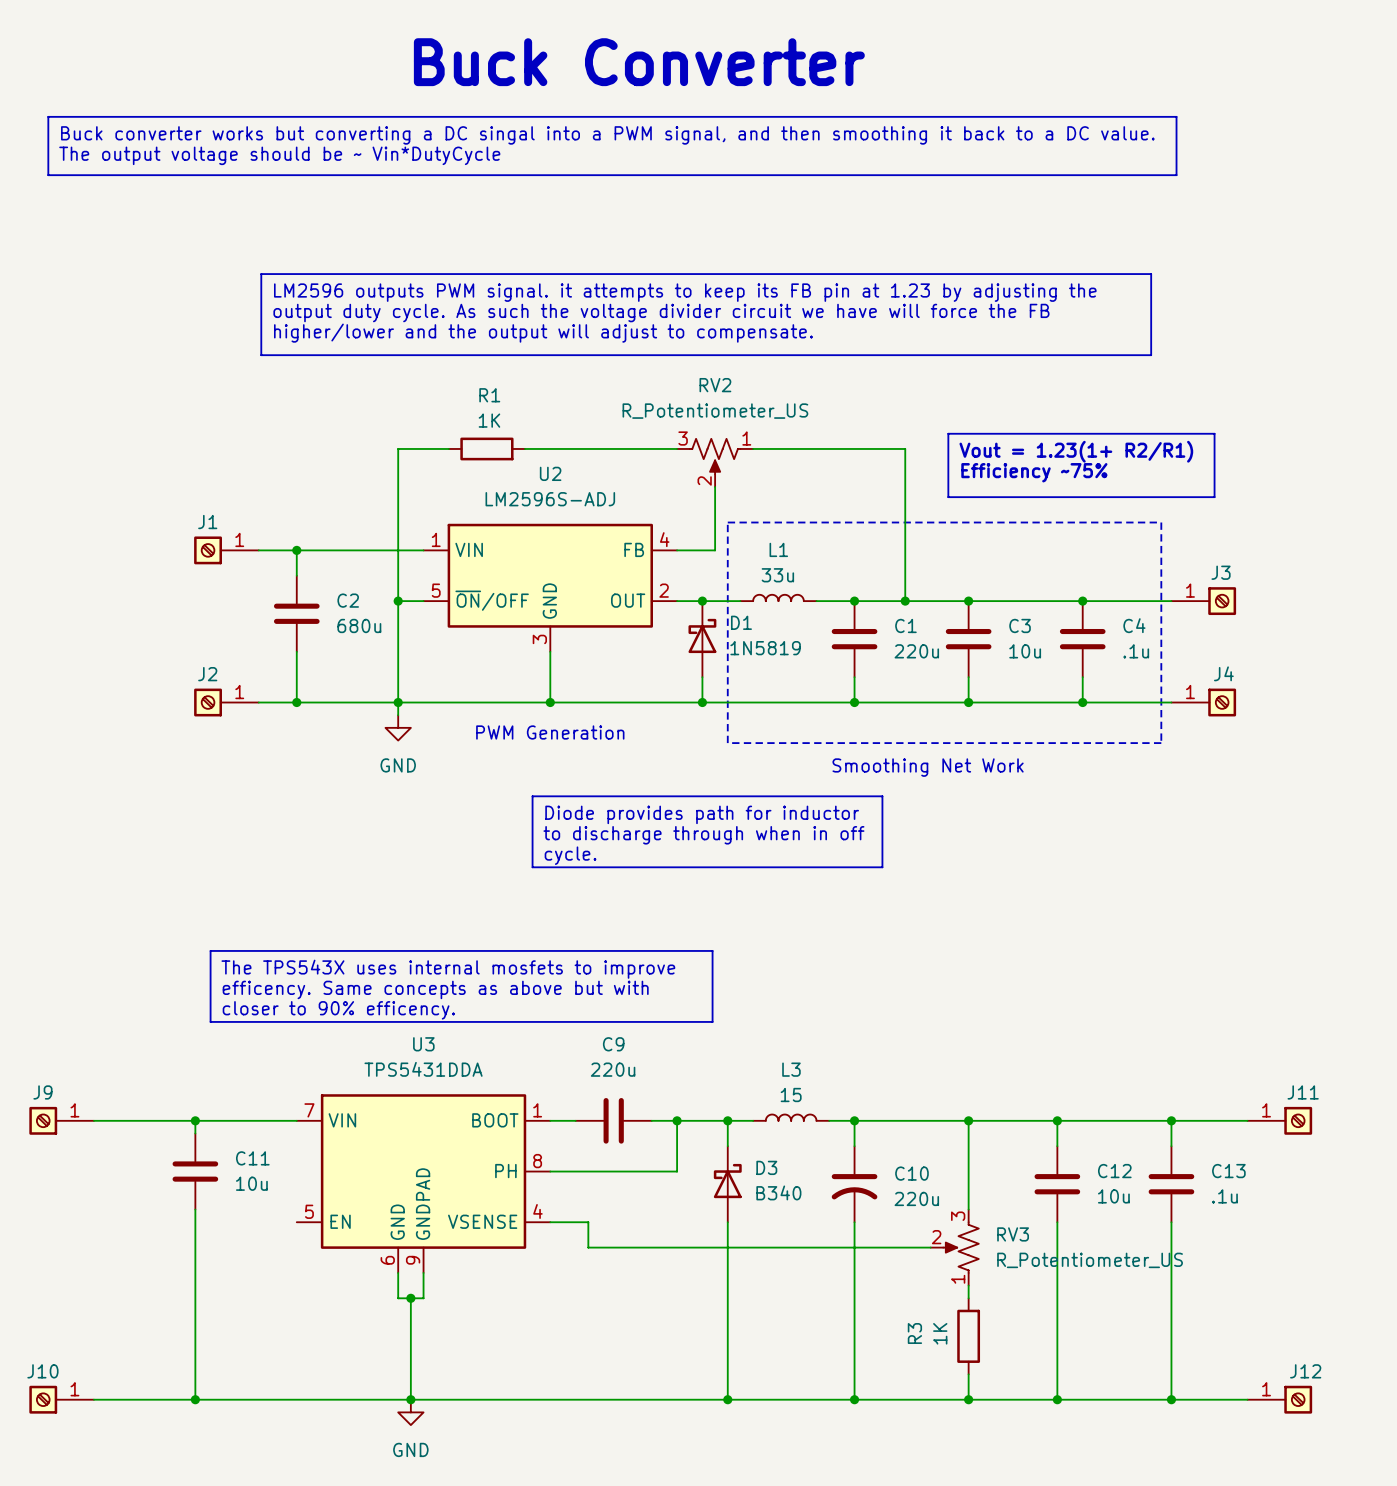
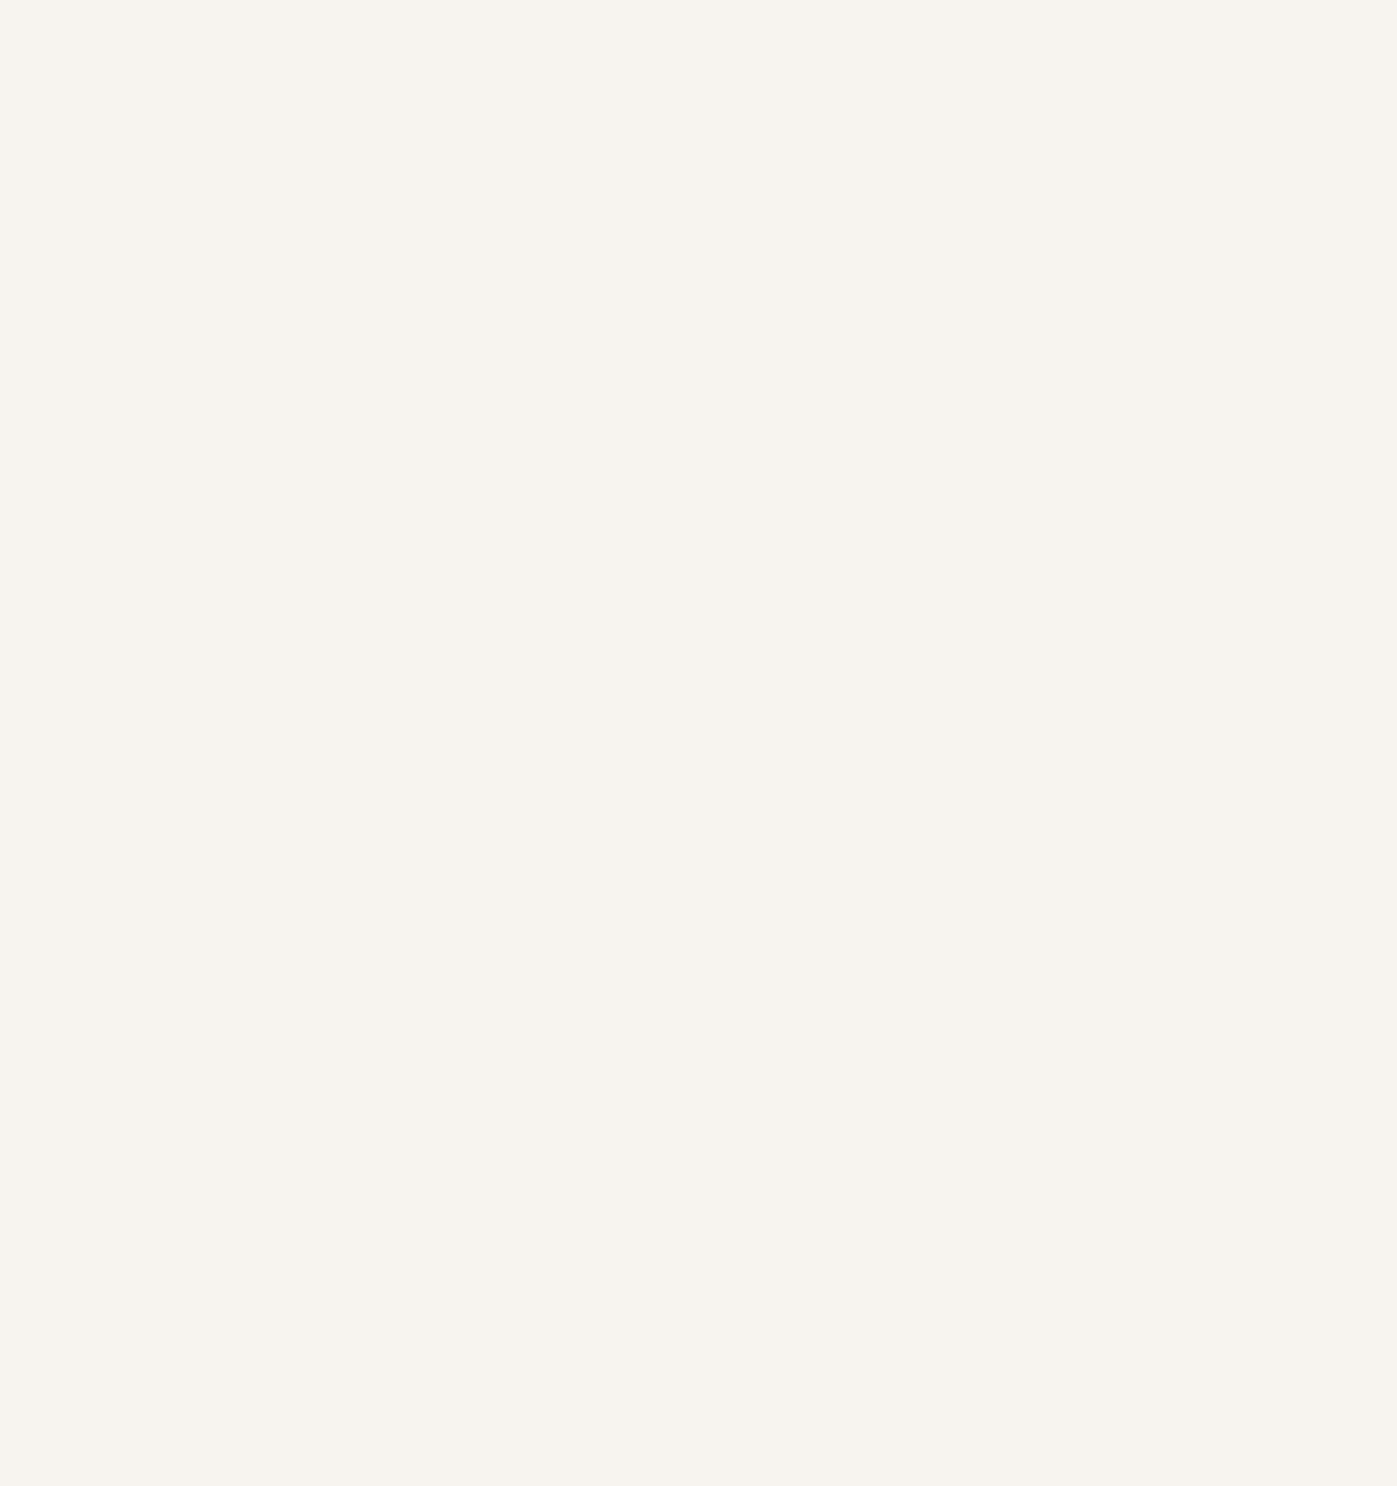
text: Buck Converter (639, 62) -> none
line: (48, 116) (1176, 116) (1176, 175) (48, 175) (48, 116) -> none
text: Buck converter works but converting a DC singal into a PWM signal, and then smoothing it back to a DC value. (607, 135) -> none
text: The output voltage should be ~ Vin*DutyCycle (279, 155) -> none
line: (261, 274) (1151, 274) (1151, 355) (261, 355) (261, 274) -> none
text: LM2596 outputs PWM signal. it attempts to keep its FB pin at 1.23 by adjusting the (685, 292) -> none
text: output duty cycle. As such the voltage divider circuit we have will force the FB (661, 313) -> none
text: higher/lower and the output will adjust to compensate. (543, 333) -> none
line: (948, 433) (1214, 433) (1214, 497) (948, 497) (948, 433) -> none
wire: (448, 448) (398, 448) (398, 715) -> none
R1: 1K (486, 448) -> none
wire: (524, 448) (677, 448) -> none
wire: (753, 448) (905, 448) (905, 601) -> none
text: Vout = 1.23(1+ R2/R1) (1076, 451) -> none
RV2: R_Potentiometer_US (715, 462) -> none
text: Efficiency ~75% (1034, 472) -> none
wire: (715, 487) (715, 550) (677, 550) -> none
line: (727, 522) (1161, 522) (1161, 743) (727, 743) (727, 522) -> none
J1: (226, 550) -> none
wire: (258, 550) (423, 550) -> none
wire: (296, 550) (296, 575) -> none
junction: (296, 550) -> none
U2: LM2596S-ADJ (550, 587) -> none
L1: 33u (778, 597) -> none
wire: (398, 601) (423, 601) -> none
junction: (398, 601) -> none
wire: (677, 601) (740, 601) -> none
junction: (702, 601) -> none
wire: (816, 601) (1171, 601) -> none
junction: (854, 601) -> none
junction: (905, 601) -> none
junction: (968, 601) -> none
junction: (1082, 601) -> none
J3: (1203, 601) -> none
C2: 680u (296, 613) -> none
D1: 1N5819 (702, 639) -> none
C1: 220u (854, 639) -> none
C3: 10u (968, 639) -> none
C4: .1u (1082, 639) -> none
wire: (296, 651) (296, 702) -> none
wire: (550, 651) (550, 702) -> none
wire: (702, 677) (702, 702) -> none
wire: (854, 677) (854, 702) -> none
wire: (968, 677) (968, 702) -> none
wire: (1082, 677) (1082, 702) -> none
J2: (226, 702) -> none
wire: (258, 702) (1171, 702) -> none
junction: (296, 702) -> none
junction: (398, 702) -> none
junction: (550, 702) -> none
junction: (702, 702) -> none
junction: (854, 702) -> none
junction: (968, 702) -> none
junction: (1082, 702) -> none
J4: (1203, 702) -> none
power symbol: GND (398, 727) -> none
text: PWM Generation (550, 732) -> none
text: Smoothing Net Work (928, 767) -> none
line: (532, 796) (882, 796) (882, 867) (532, 867) (532, 796) -> none
text: Diode provides path for inductor (702, 814) -> none
text: to discharge through when in off (703, 835) -> none
text: cycle. (570, 855) -> none
line: (210, 950) (712, 950) (712, 1021) (210, 1021) (210, 950) -> none
text: The TPS543X uses internal mosfets to improve (448, 969) -> none
text: efficency. Same concepts as above but with (435, 989) -> none
text: closer to 90% efficency. (338, 1010) -> none
L3: 15 (791, 1117) -> none
J9: (61, 1120) -> none
wire: (93, 1120) (296, 1120) -> none
wire: (195, 1120) (195, 1133) -> none
junction: (195, 1120) -> none
wire: (550, 1120) (575, 1120) -> none
C9: 220u (613, 1120) -> none
wire: (651, 1120) (753, 1120) -> none
wire: (677, 1120) (677, 1171) (550, 1171) -> none
junction: (677, 1120) -> none
wire: (727, 1120) (727, 1146) -> none
junction: (727, 1120) -> none
wire: (829, 1120) (1247, 1120) -> none
wire: (854, 1120) (854, 1146) -> none
junction: (854, 1120) -> none
wire: (968, 1120) (968, 1209) -> none
junction: (968, 1120) -> none
wire: (1057, 1120) (1057, 1146) -> none
junction: (1057, 1120) -> none
wire: (1171, 1120) (1171, 1146) -> none
junction: (1171, 1120) -> none
J11: (1279, 1120) -> none
C11: 10u (195, 1171) -> none
U3: TPS5431DDA (423, 1183) -> none
D3: B340 (727, 1184) -> none
C10: 220u (854, 1184) -> none
C12: 10u (1057, 1184) -> none
C13: .1u (1171, 1184) -> none
wire: (195, 1209) (195, 1399) -> none
wire: (550, 1222) (588, 1222) (588, 1247) (930, 1247) -> none
wire: (727, 1222) (727, 1399) -> none
wire: (854, 1222) (854, 1399) -> none
wire: (1057, 1222) (1057, 1399) -> none
wire: (1171, 1222) (1171, 1399) -> none
RV3: R_Potentiometer_US (954, 1247) -> none
wire: (398, 1272) (398, 1298) (423, 1298) (423, 1272) -> none
wire: (968, 1285) (968, 1298) -> none
wire: (410, 1298) (410, 1399) -> none
junction: (410, 1298) -> none
R3: 1K (968, 1336) -> none
wire: (968, 1374) (968, 1399) -> none
J10: (61, 1399) -> none
wire: (93, 1399) (1247, 1399) -> none
junction: (195, 1399) -> none
junction: (410, 1399) -> none
junction: (727, 1399) -> none
junction: (854, 1399) -> none
junction: (968, 1399) -> none
junction: (1057, 1399) -> none
junction: (1171, 1399) -> none
J12: (1279, 1399) -> none
power symbol: GND (410, 1412) -> none

